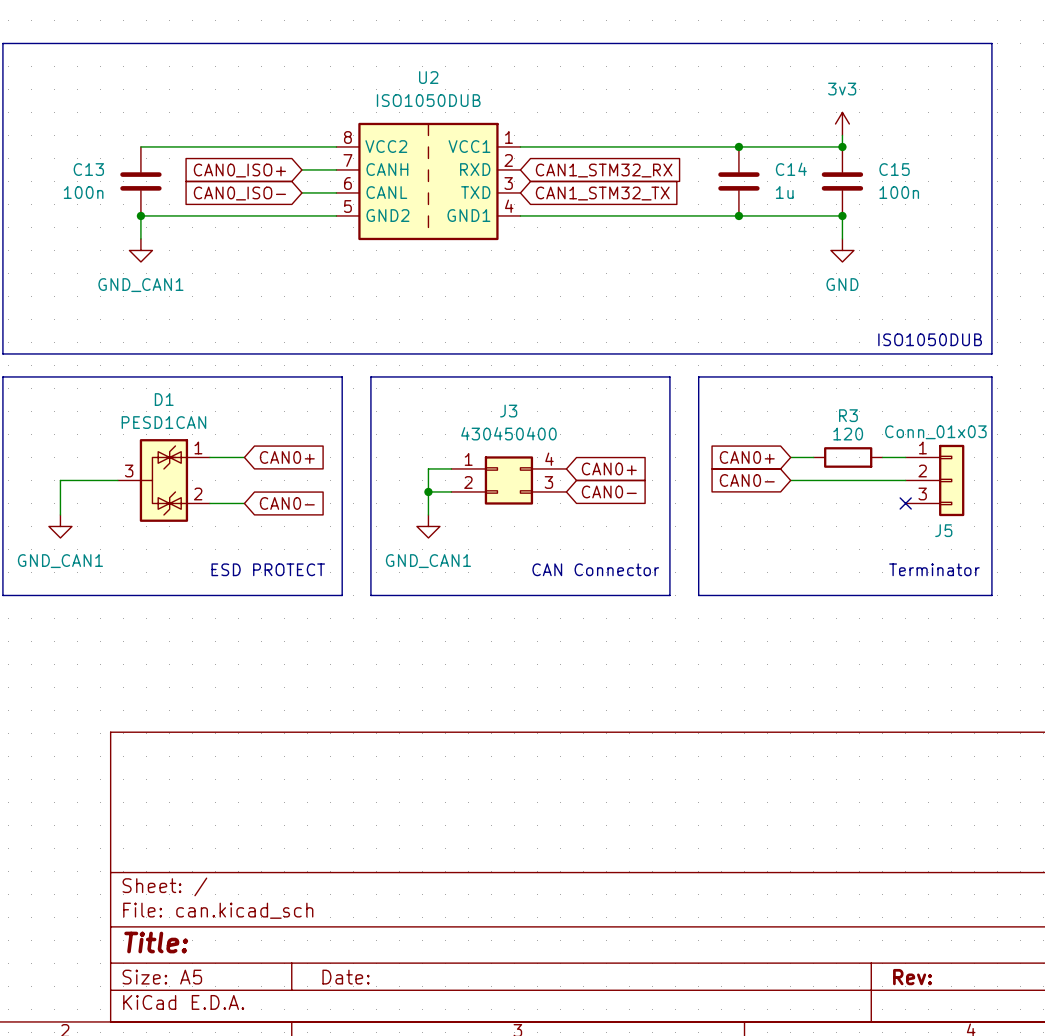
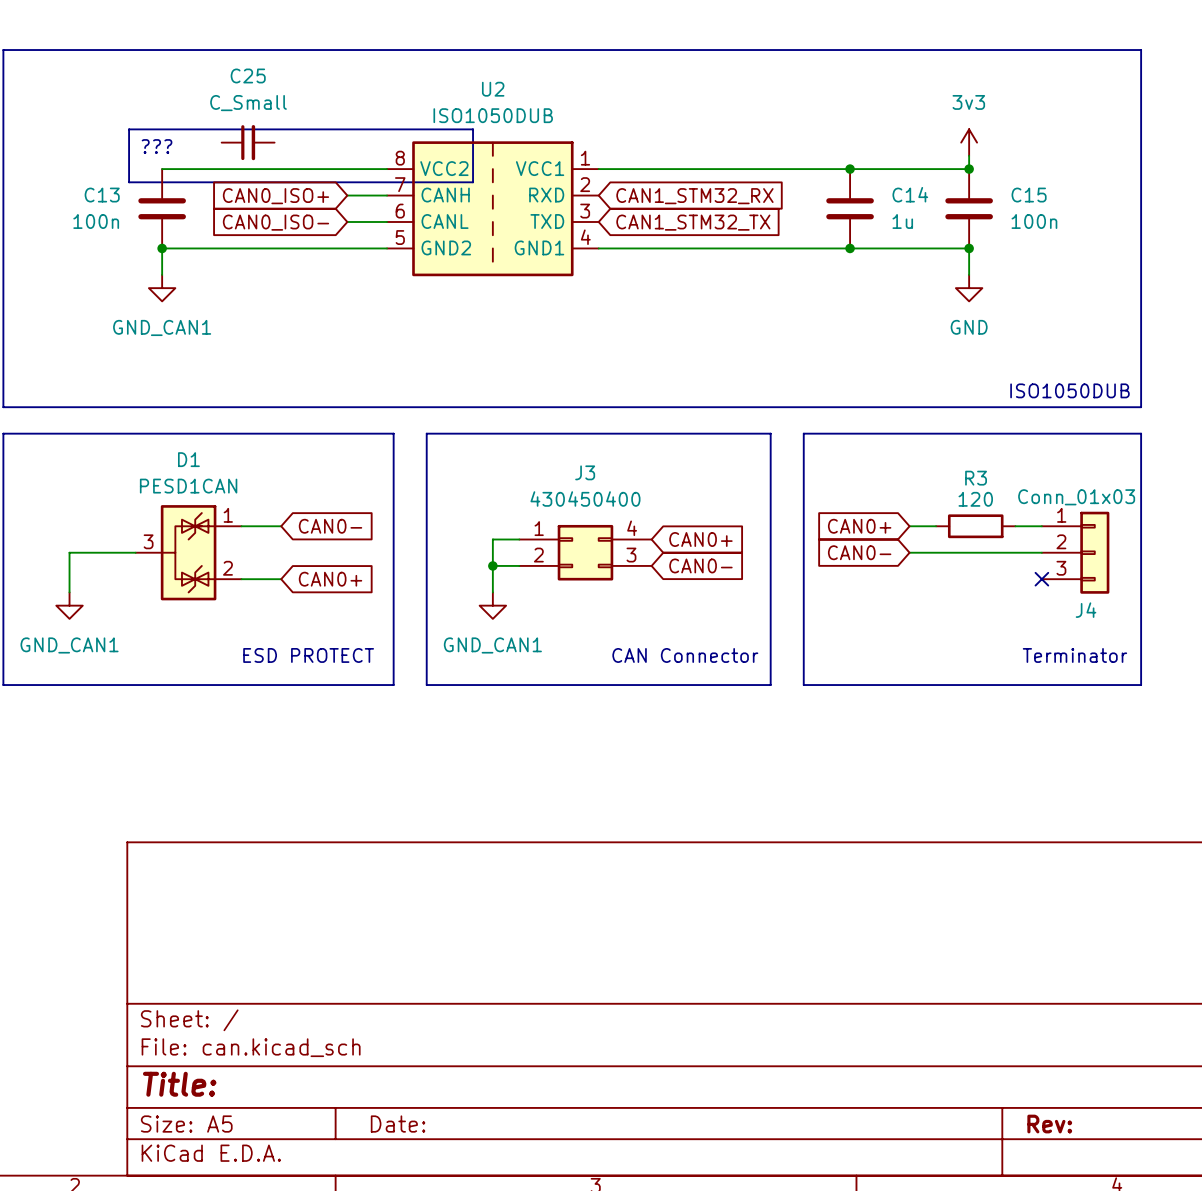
line: none -> (129, 129) (473, 129) (473, 182) (129, 182) (129, 129)
C25: none -> C_Small (248, 142)
text: none -> ??? (157, 146)
global label: CAN0+ (287, 457) -> CAN0- (330, 526)
global label: CAN0- (287, 503) -> CAN0+ (330, 579)
J5 name: J5 (943, 530) -> J4 (1086, 610)

